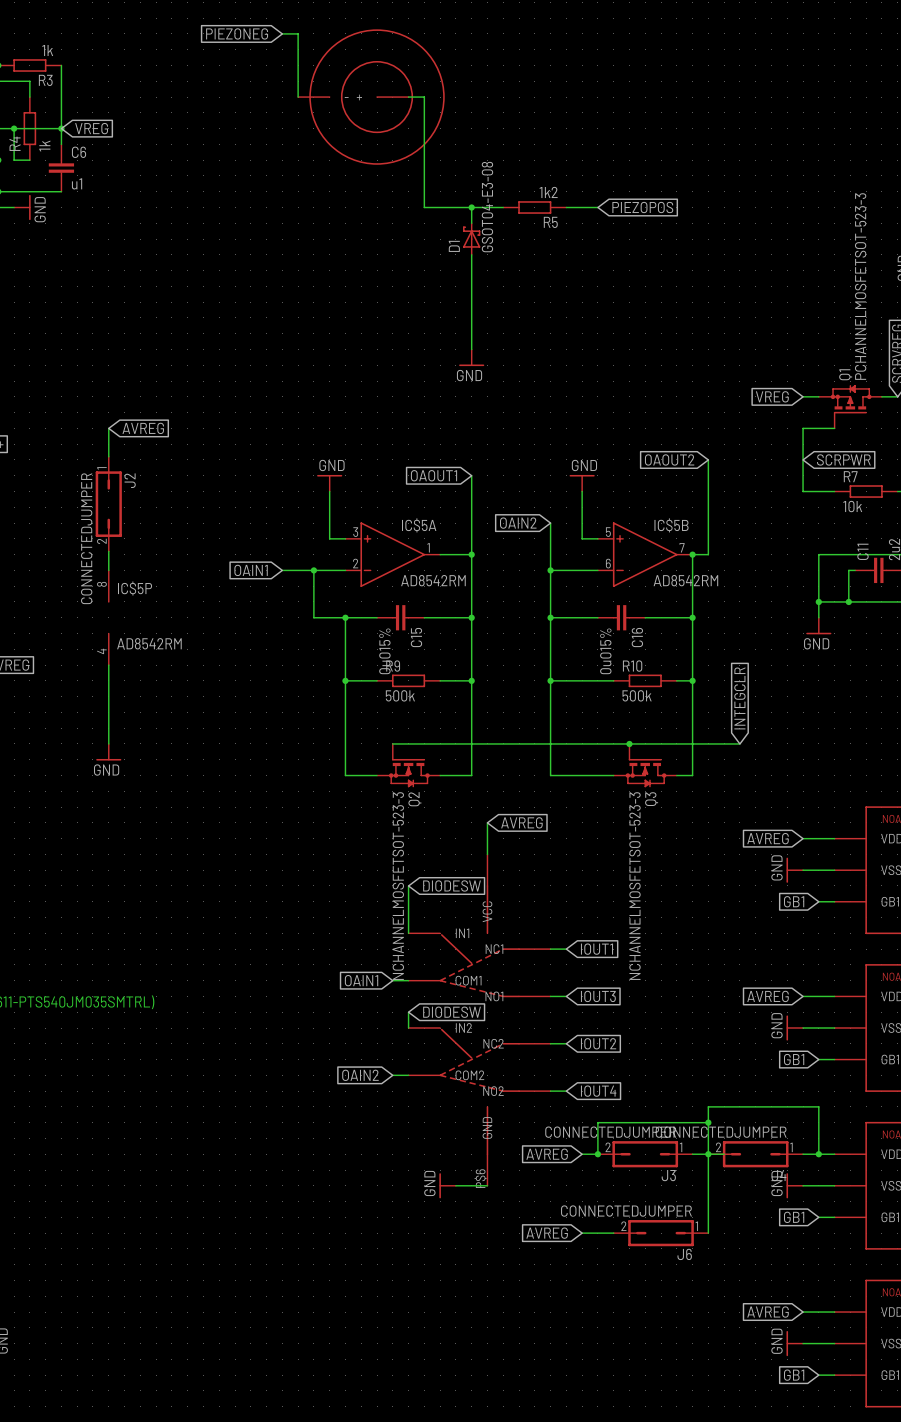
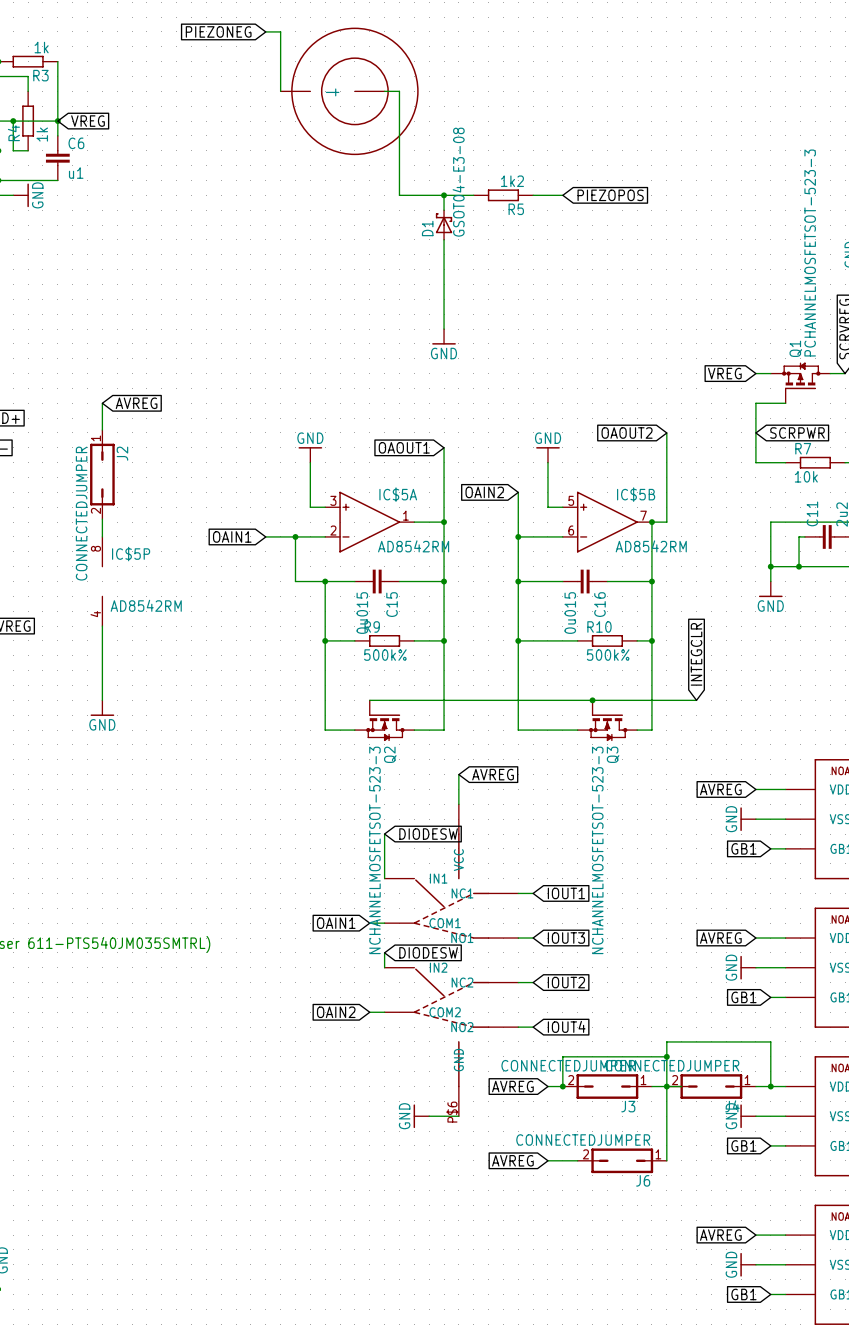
C15 value: 0u015% (384, 651) -> 0u015 (362, 613)
C16 value: 0u015% (605, 651) -> 0u015 (570, 613)
R9 value: 500k (400, 695) -> 500k% (385, 655)
R10 value: 500k (637, 695) -> 500k% (608, 655)

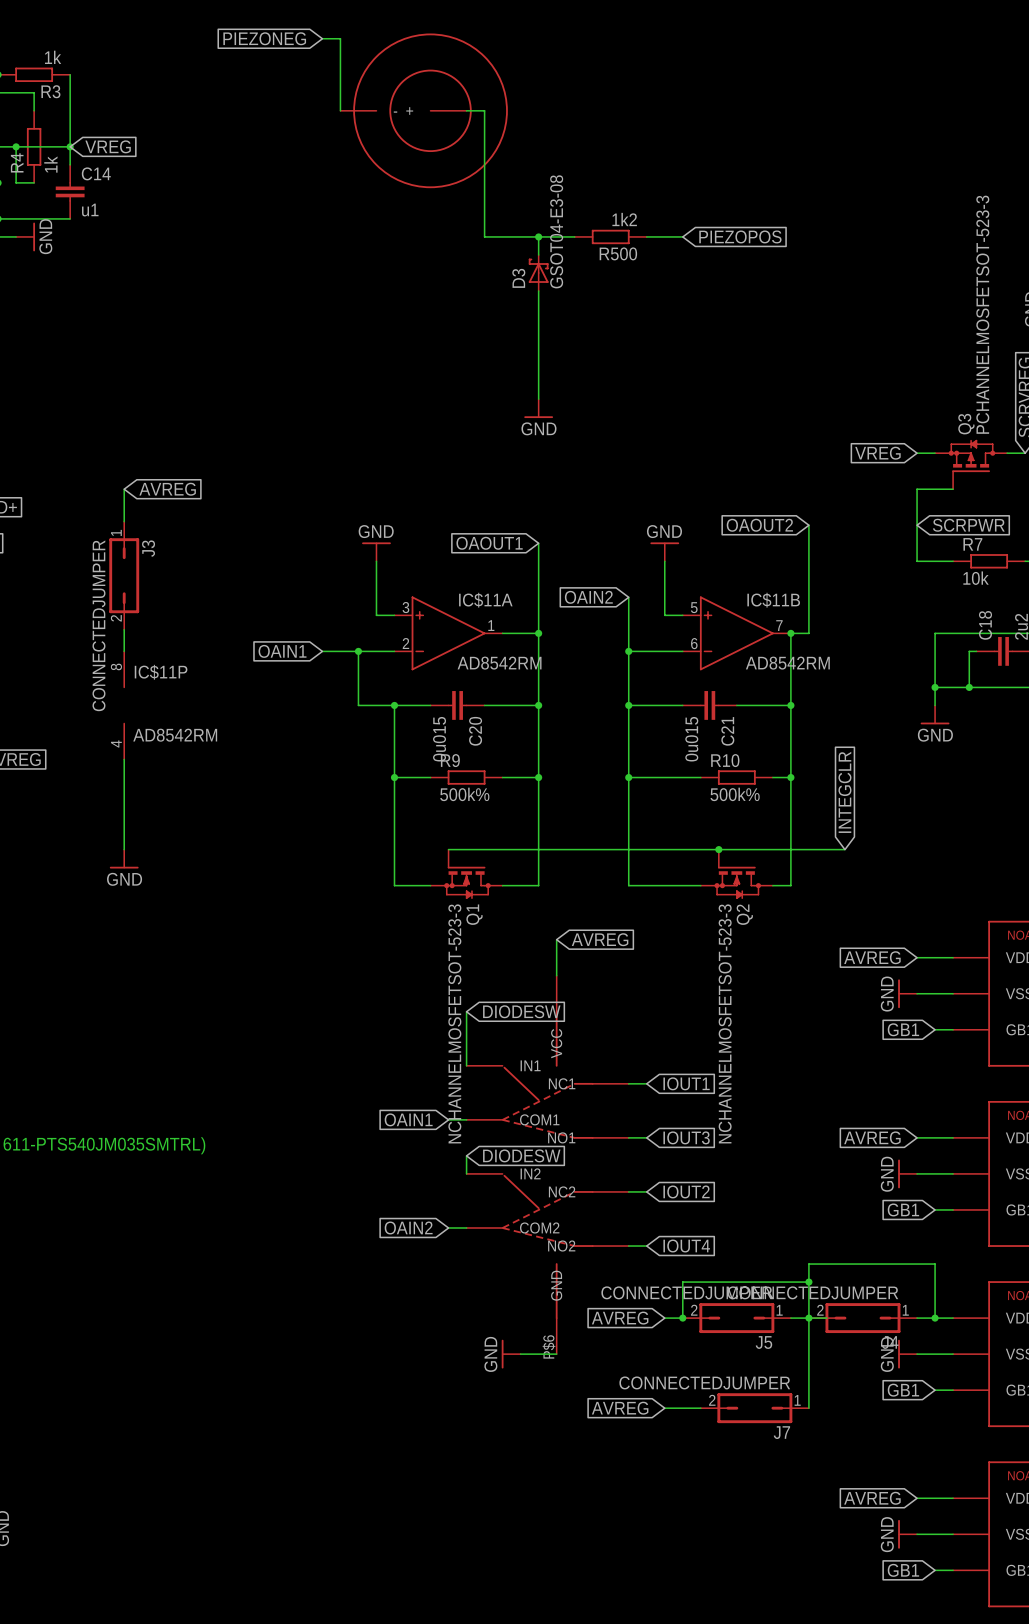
C6 name: C6 (76, 143) -> C14 (96, 173)
R5 name: R5 (516, 209) -> R500 (618, 253)
D1 name: D1 (427, 228) -> D3 (518, 278)
Q1 name: Q1 (795, 348) -> Q3 (966, 424)
J2 name: J2 (122, 453) -> J3 (148, 548)
IC$5A name: IC$5A (398, 494) -> IC$11A (485, 600)
IC$5B name: IC$5B (636, 494) -> IC$11B (773, 600)
C11 name: C11 (812, 513) -> C18 (985, 625)
IC$5P name: IC$5P (131, 554) -> IC$11P (161, 672)
C15 name: C15 (392, 604) -> C20 (475, 731)
C16 name: C16 (599, 604) -> C21 (727, 731)
Q2 name: Q2 (390, 754) -> Q1 (474, 914)
Q3 name: Q3 (613, 754) -> Q2 (744, 914)
J3 name: J3 (628, 1106) -> J5 (763, 1342)
J6 name: J6 (643, 1180) -> J7 (781, 1432)

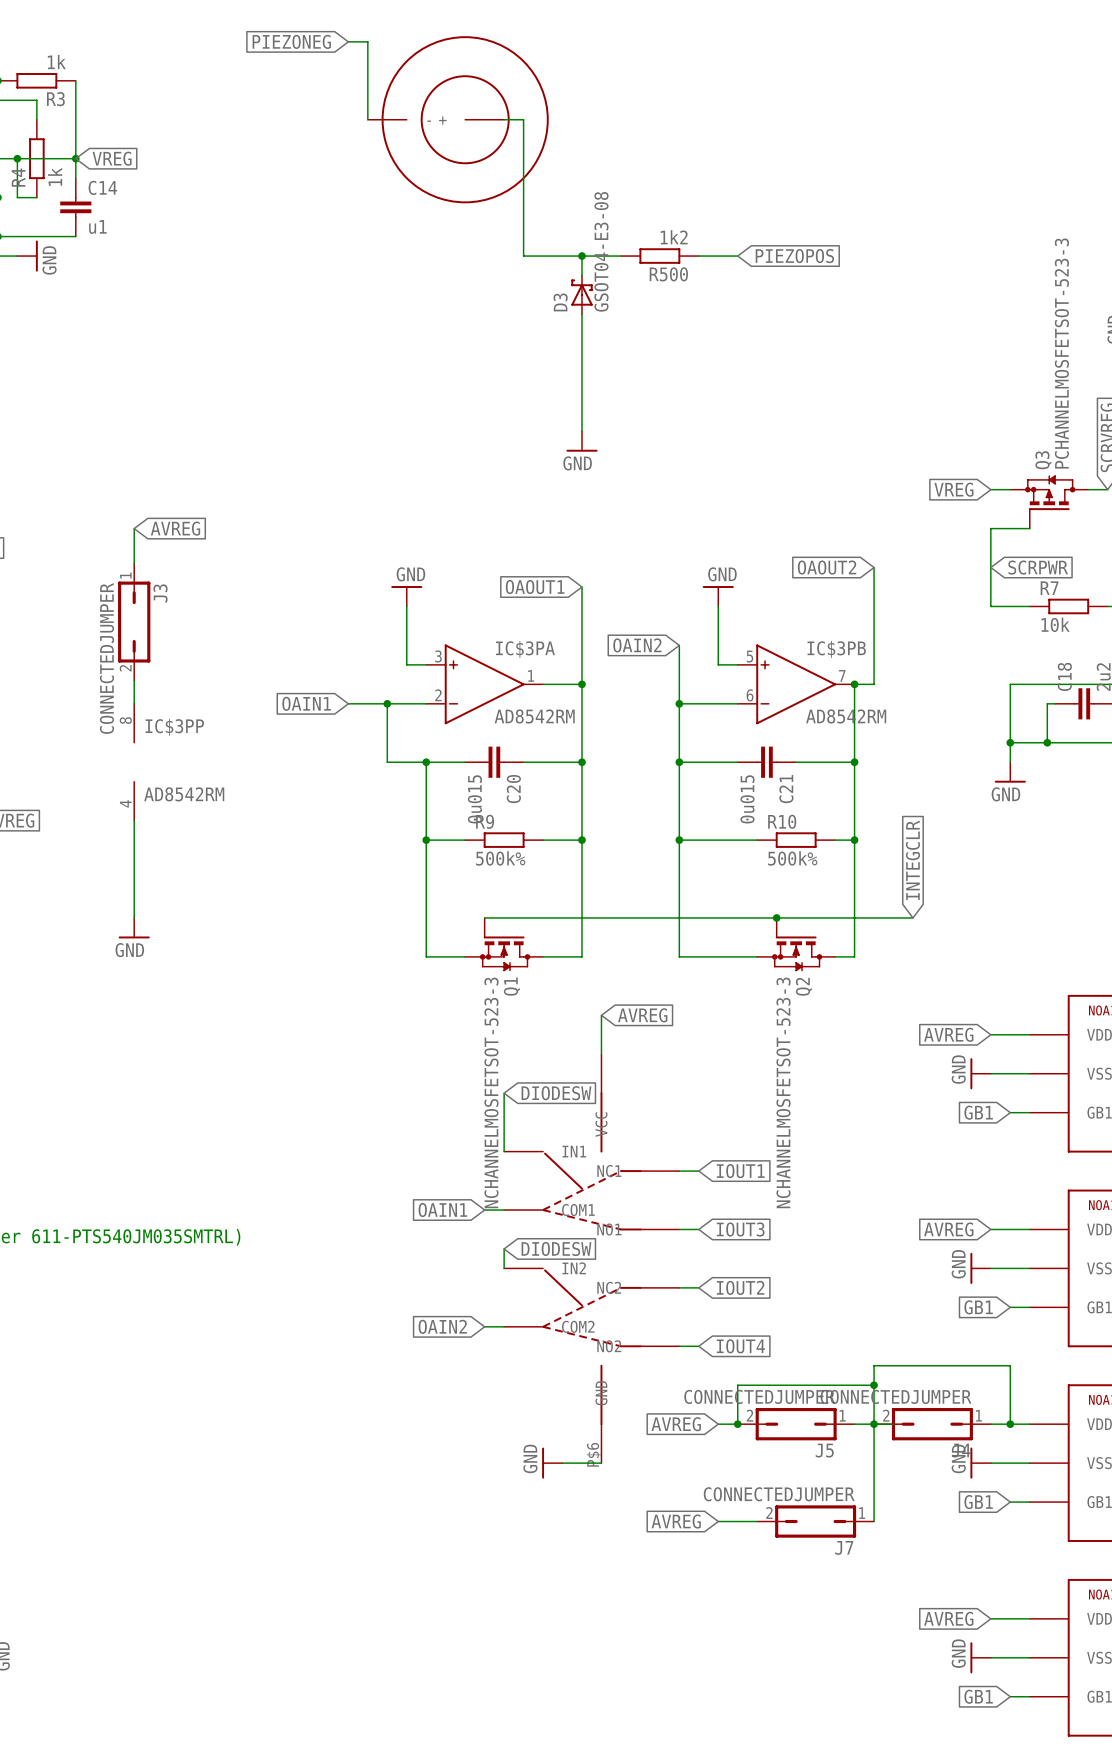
IC$11A name: IC$11A (485, 600) -> IC$3PA (525, 649)
IC$11B name: IC$11B (773, 600) -> IC$3PB (836, 649)
IC$11P name: IC$11P (161, 672) -> IC$3PP (174, 727)

